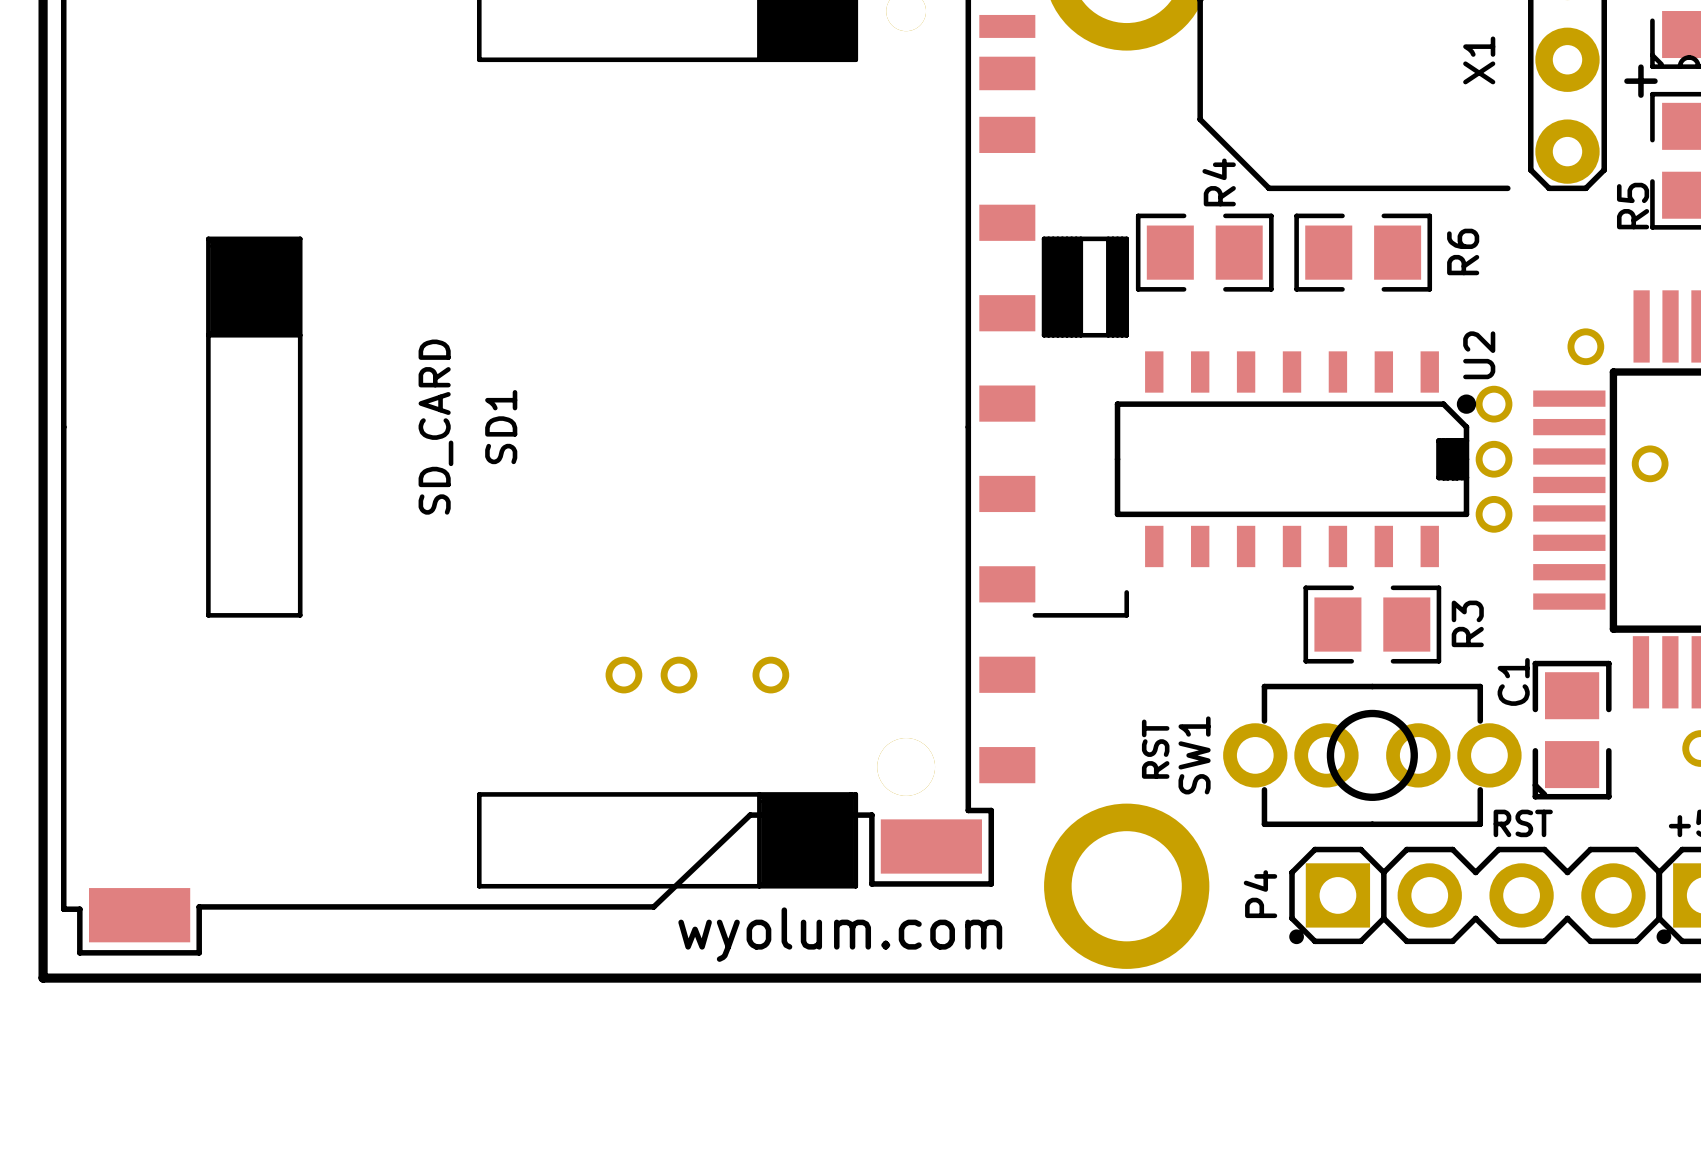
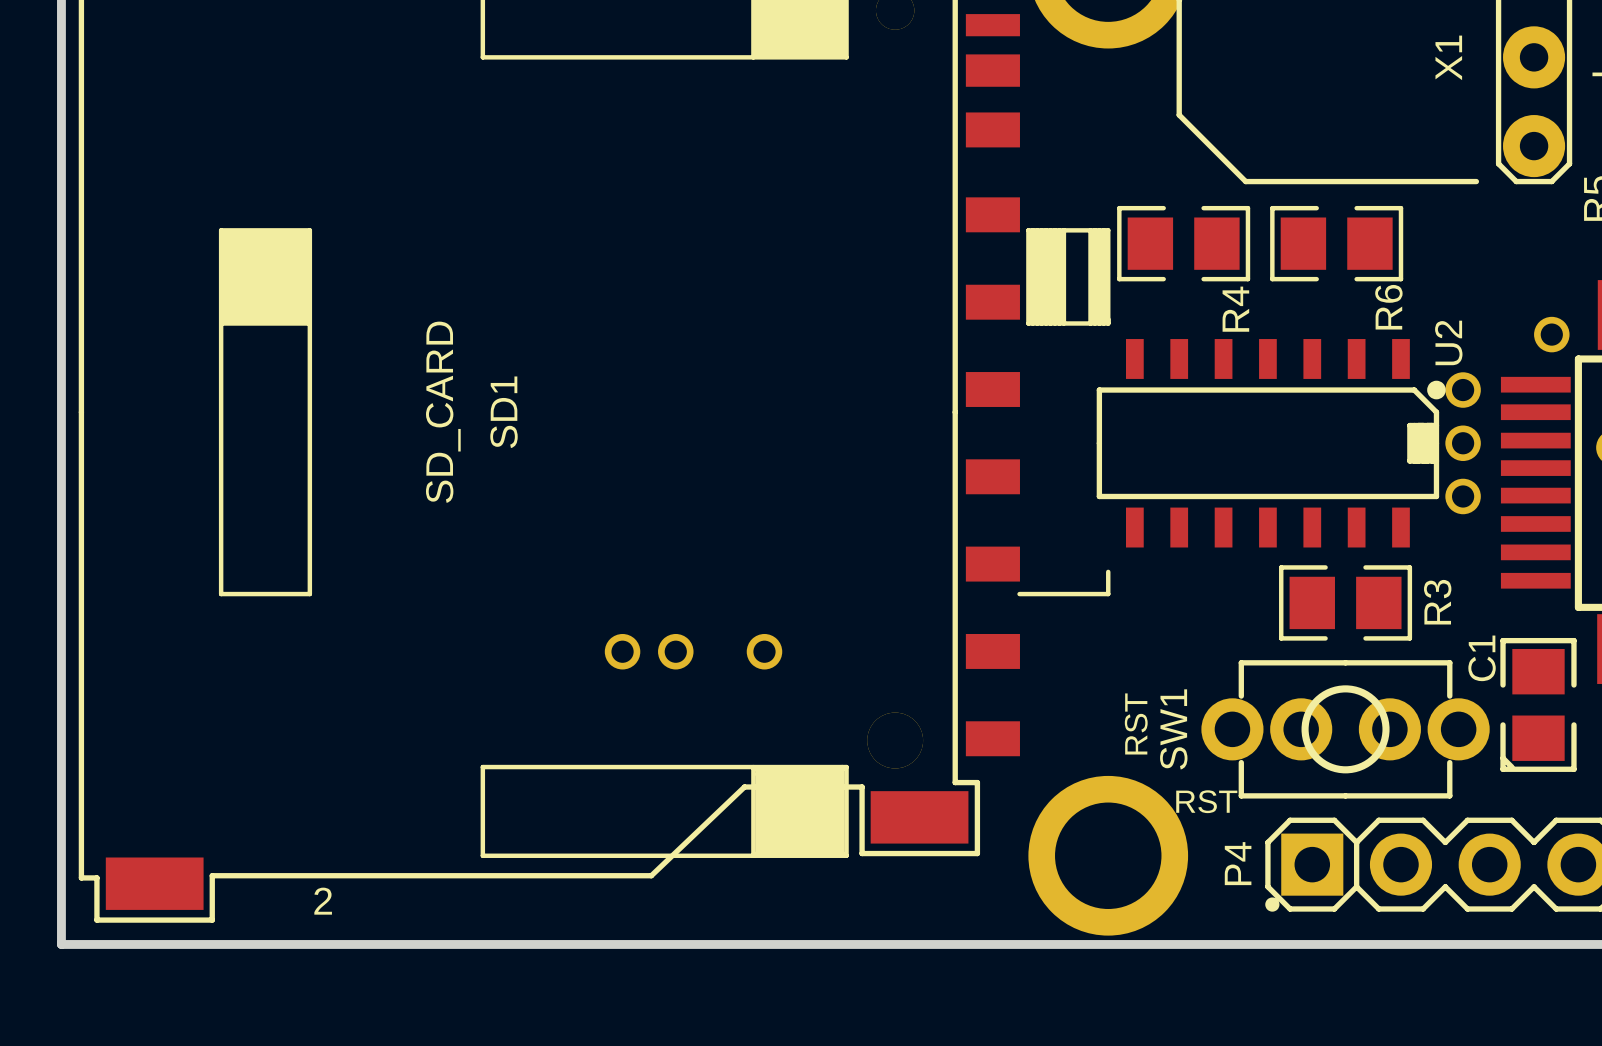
R4 name position: R4 (1219, 182) -> R4 (1235, 309)
R6 name position: R6 (1463, 251) -> R6 (1388, 307)
text position: RST (1523, 823) -> RST (1206, 801)
text: none -> 2 (323, 901)
text: wyolum.com (840, 934) -> none

